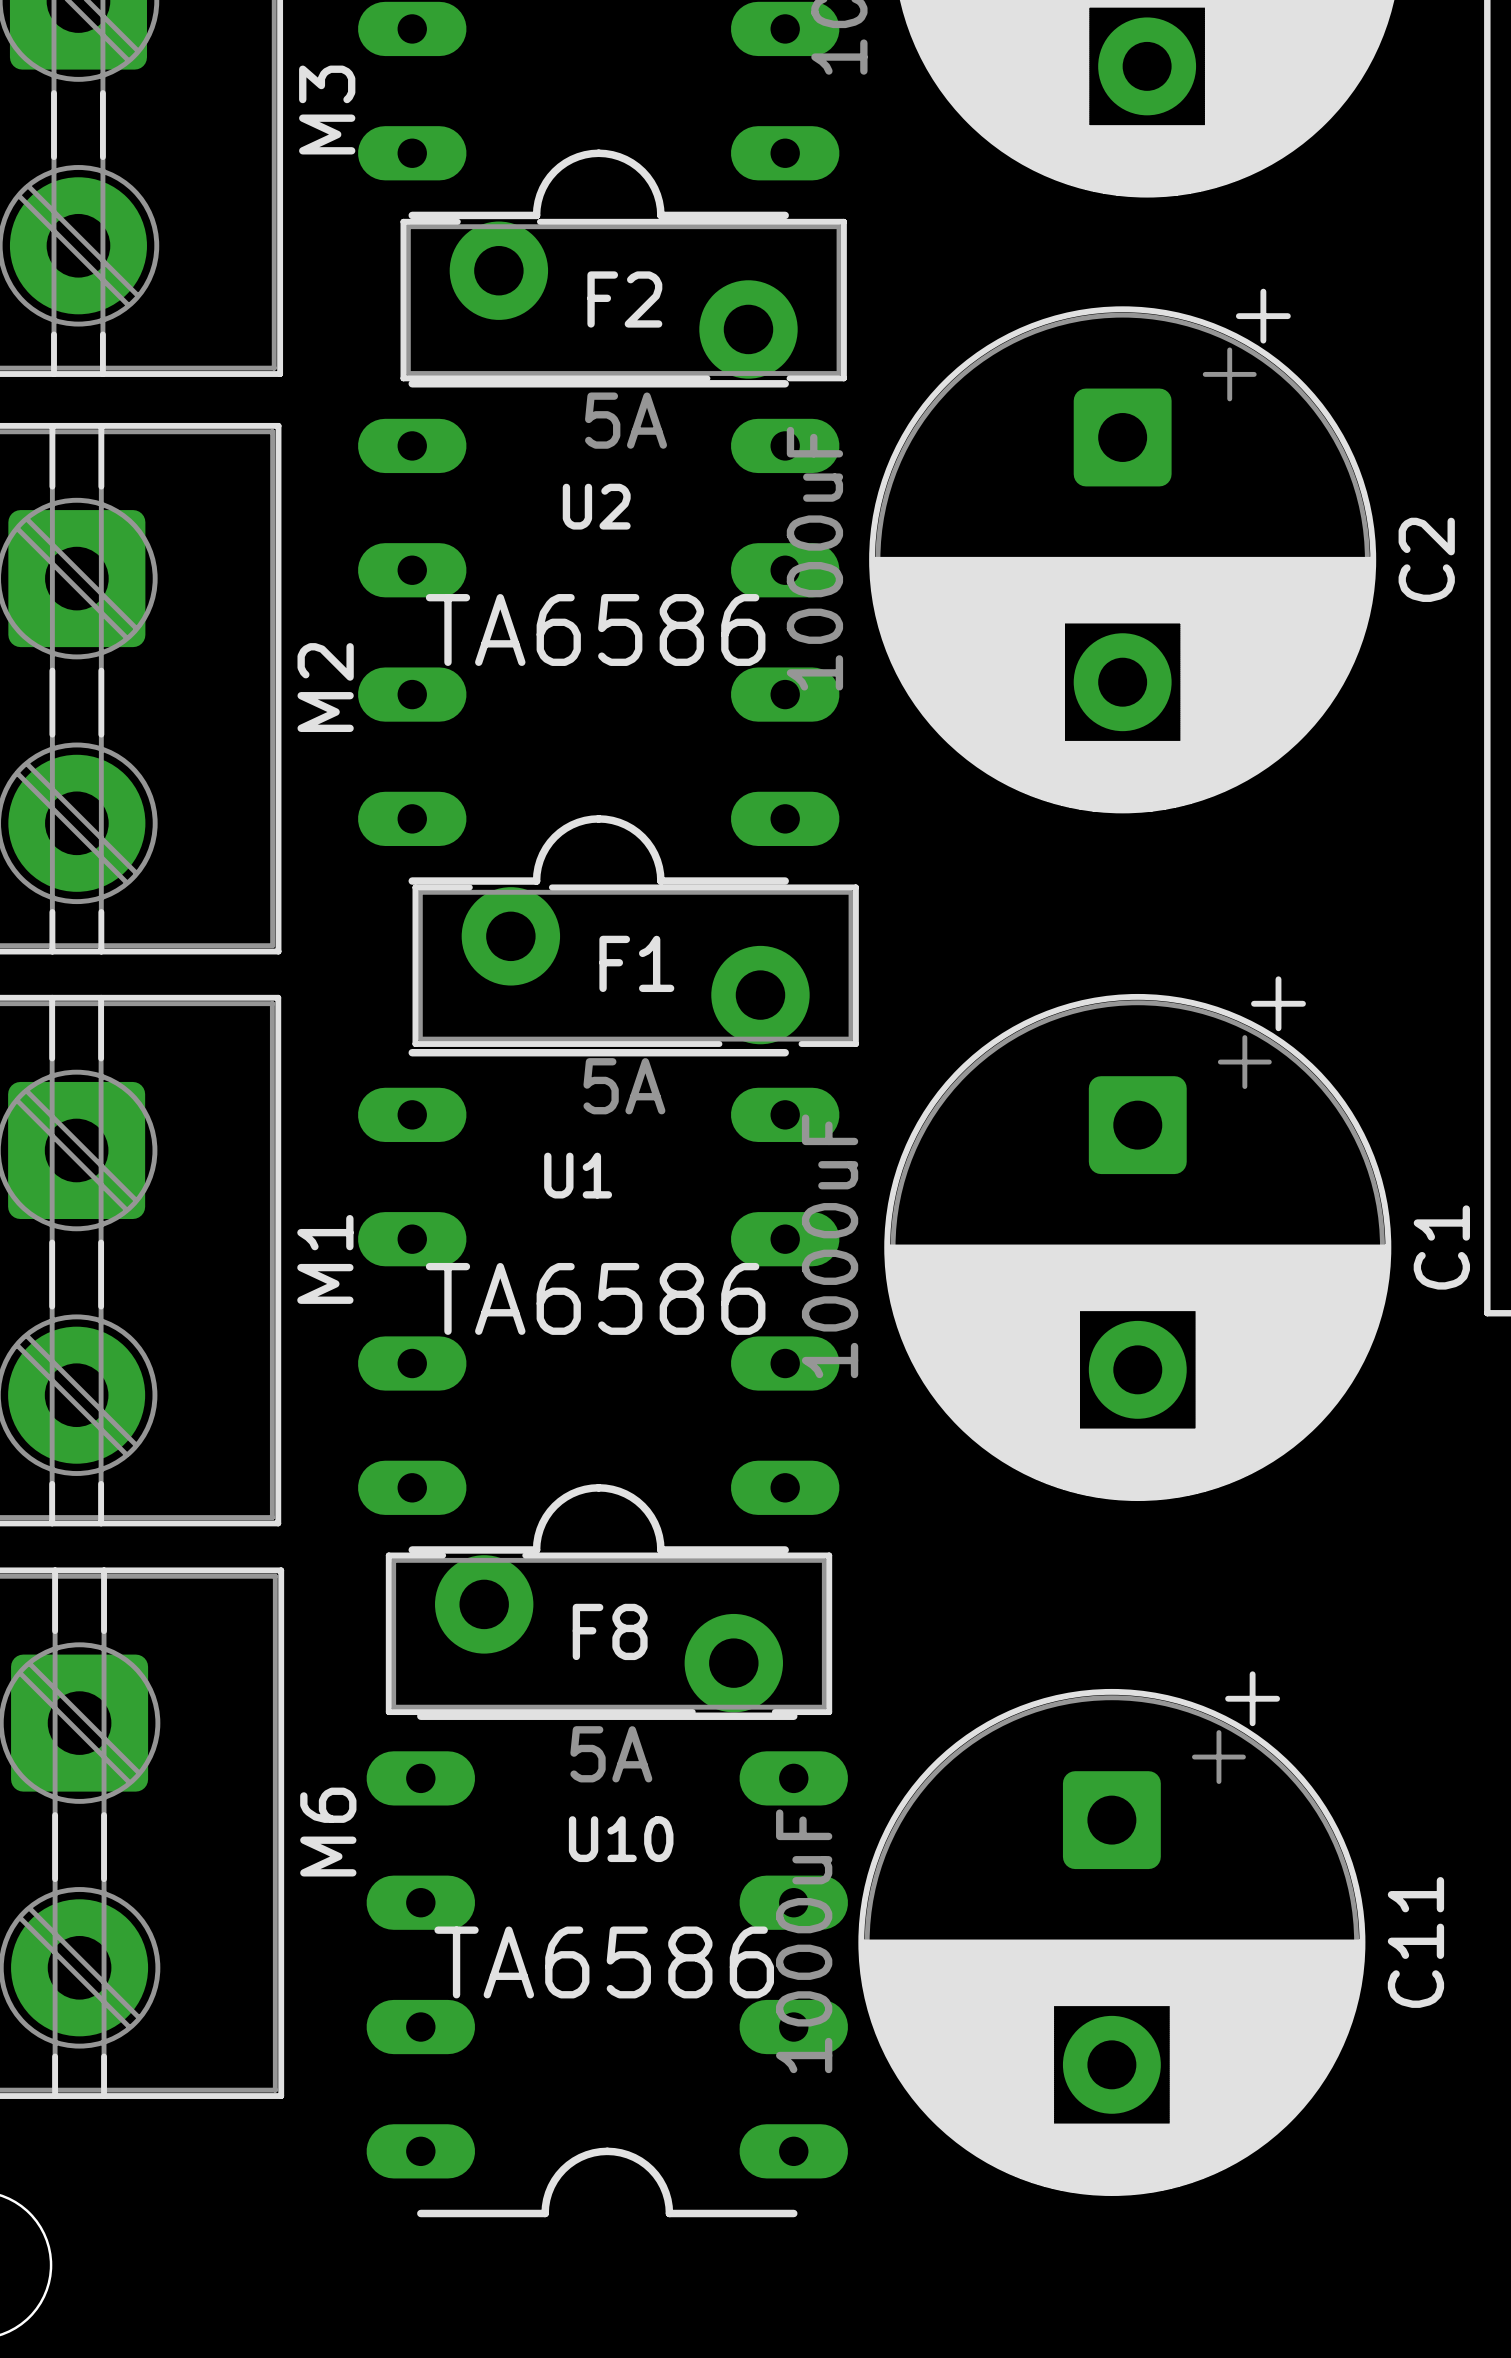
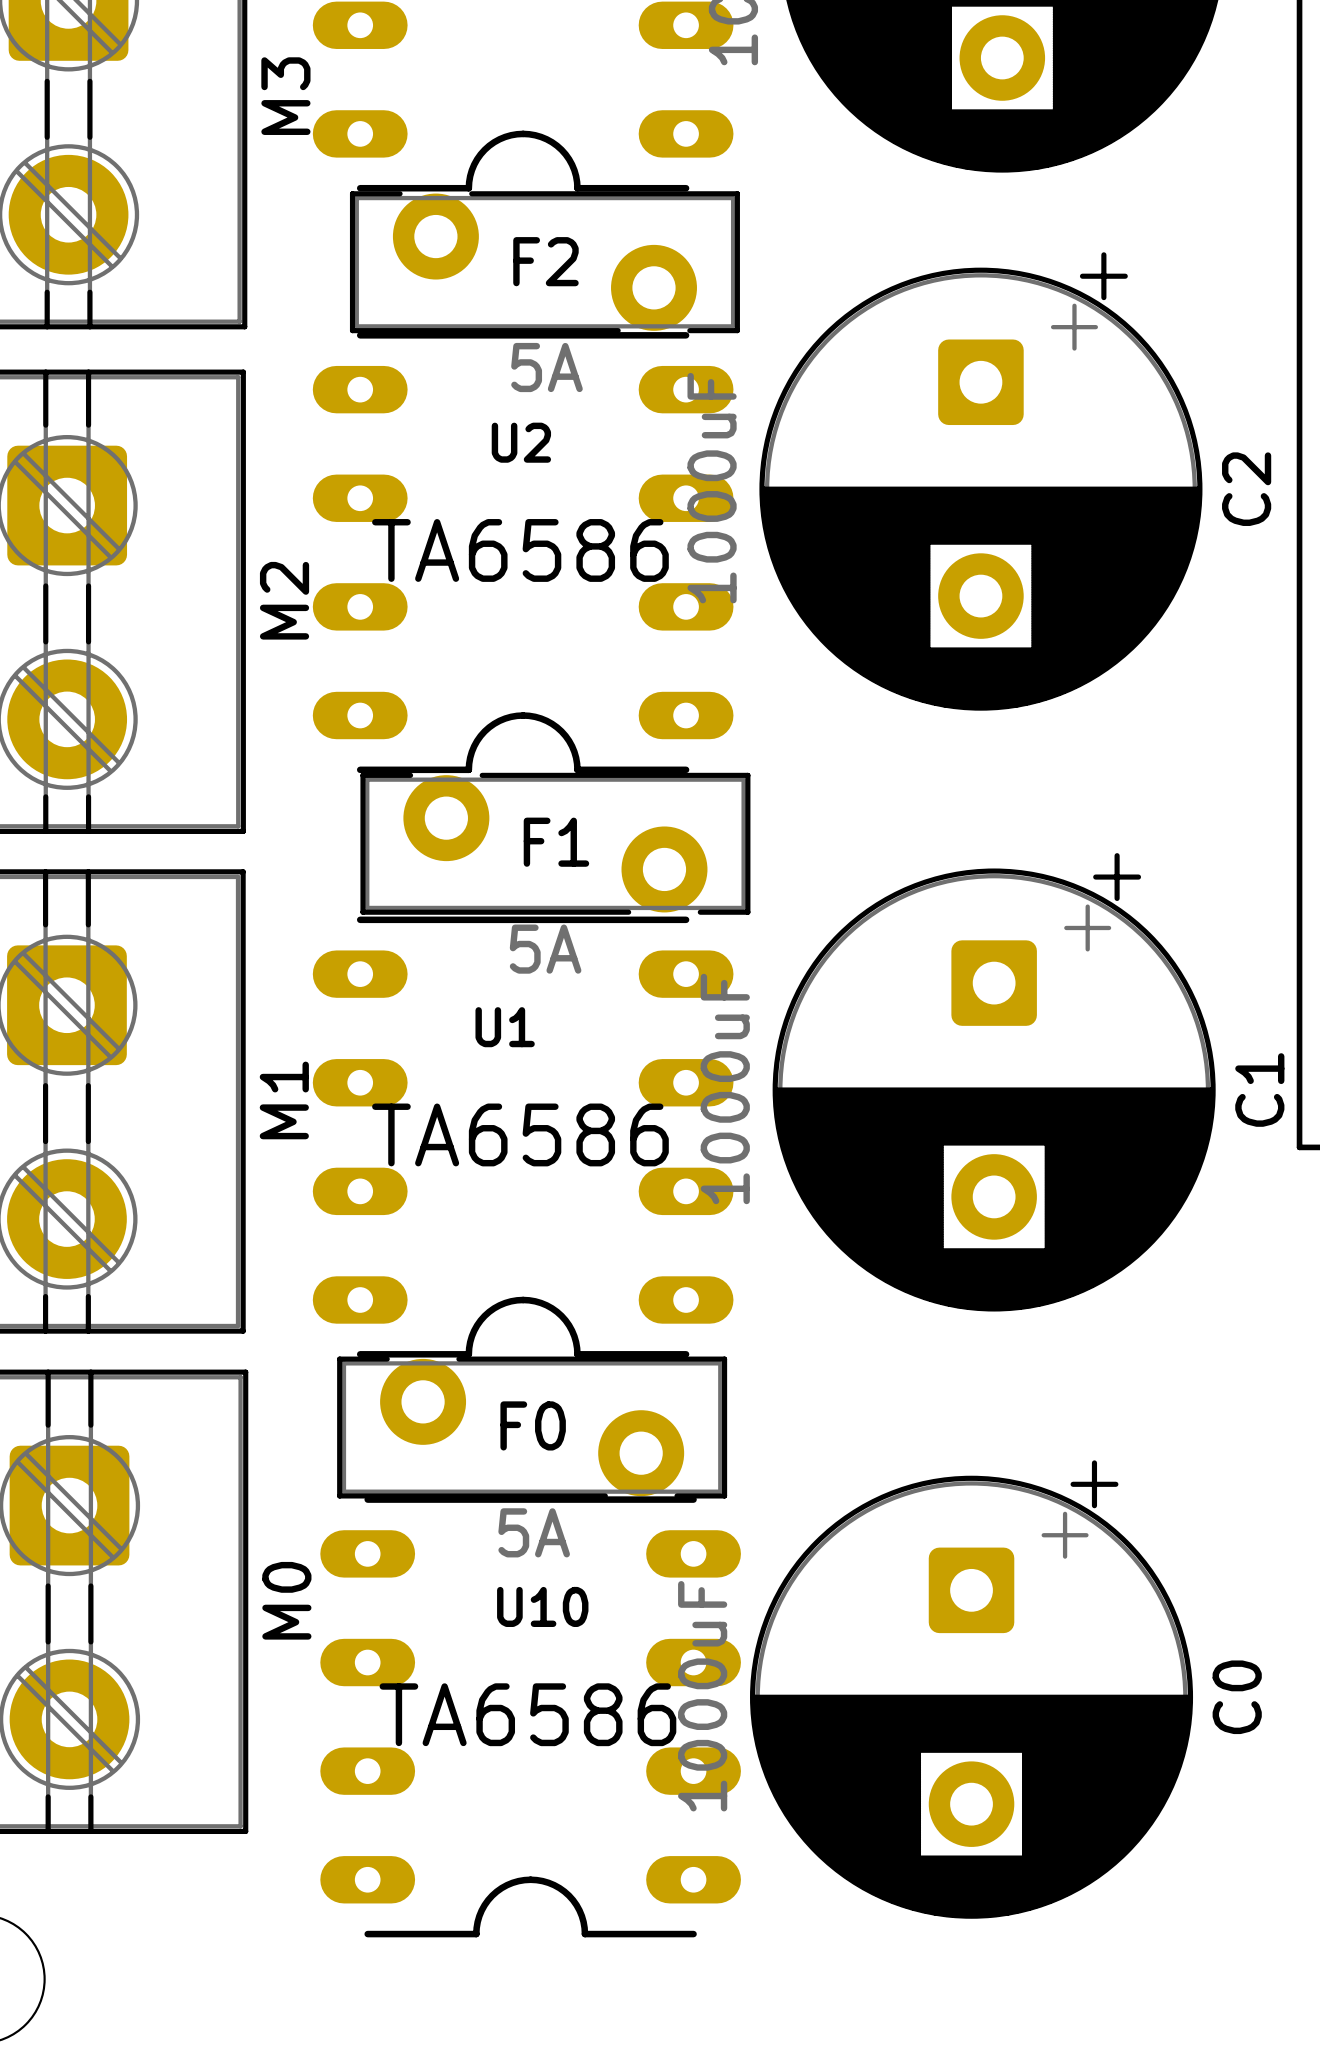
F8 name: F8 (610, 1631) -> F0 (533, 1425)
M6 name: M6 (328, 1832) -> M0 (286, 1600)
C11 name: C11 (1415, 1942) -> C0 (1237, 1697)

